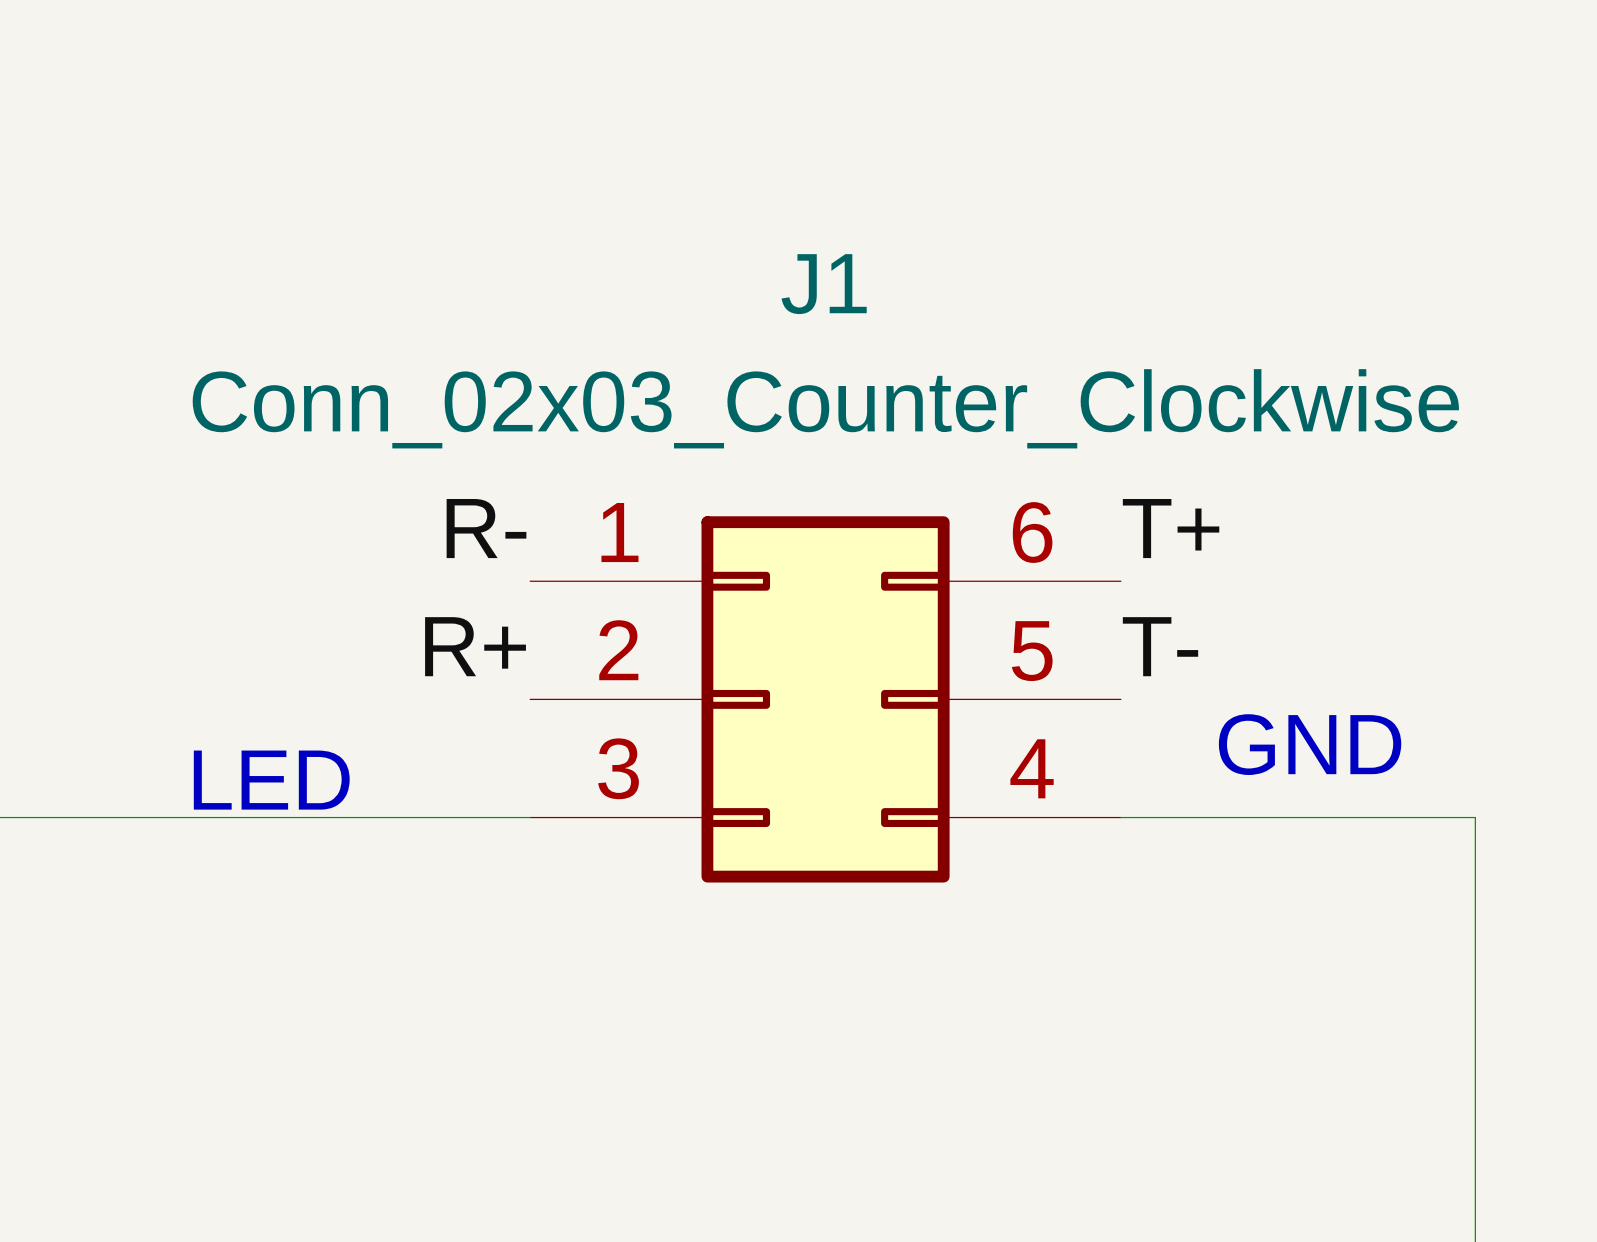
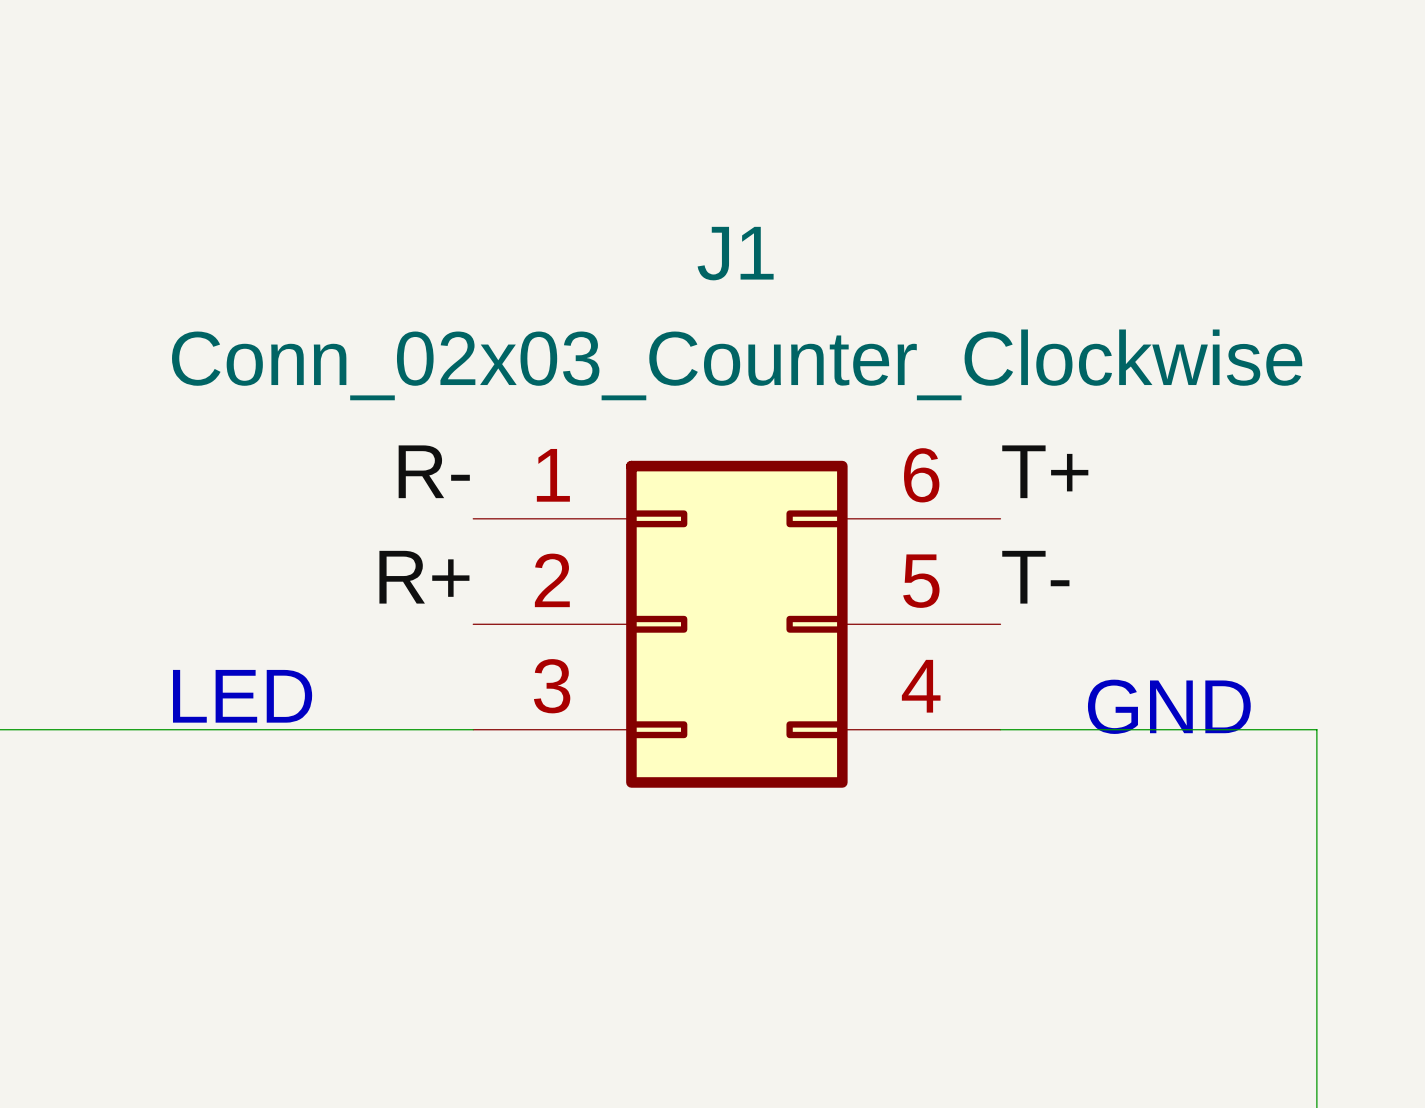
text position: GND (1310, 744) -> GND (1169, 706)

